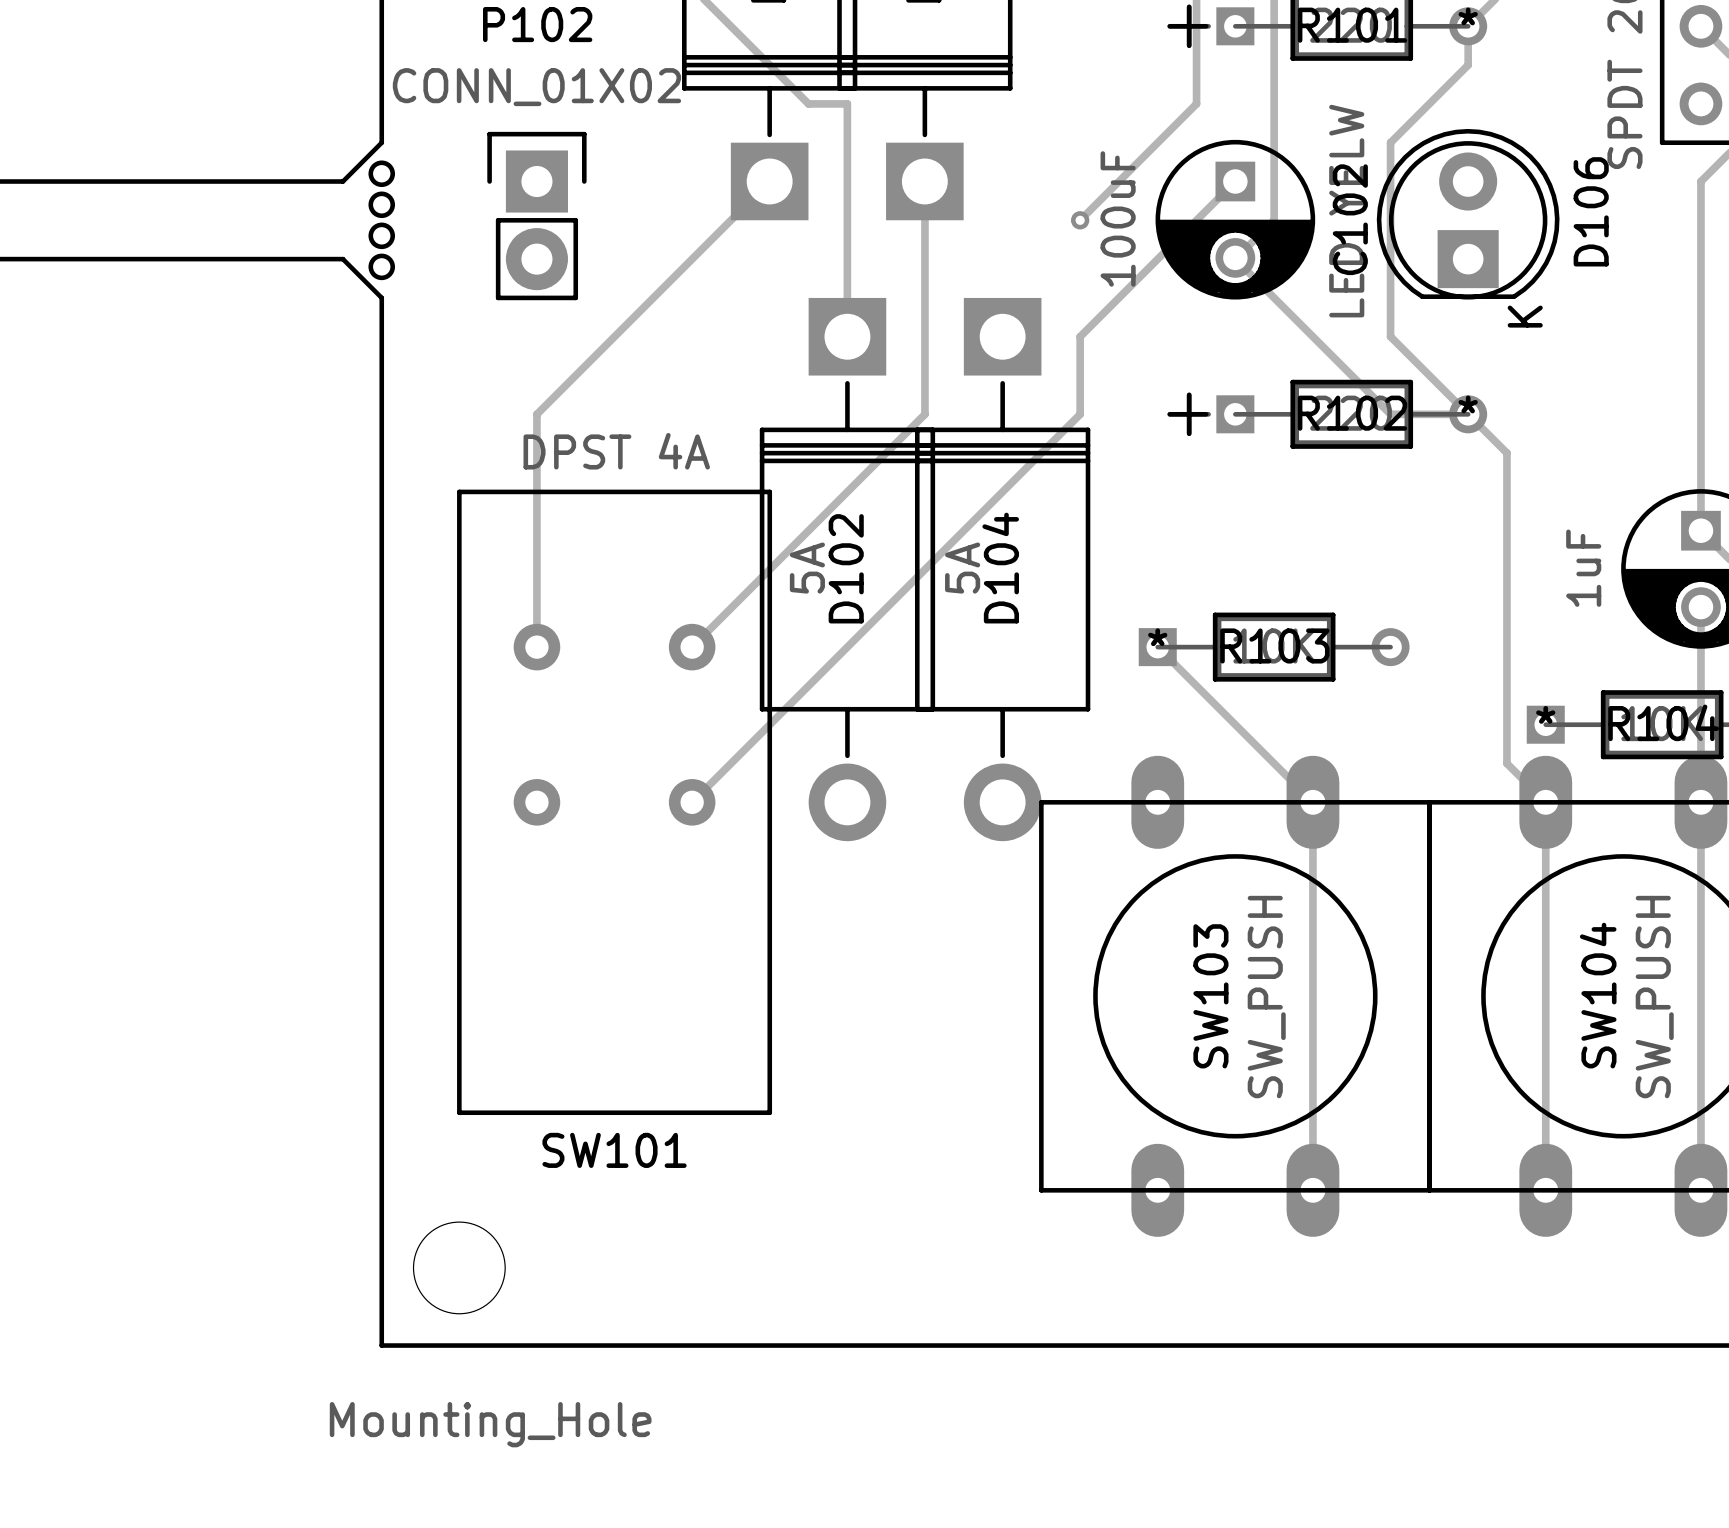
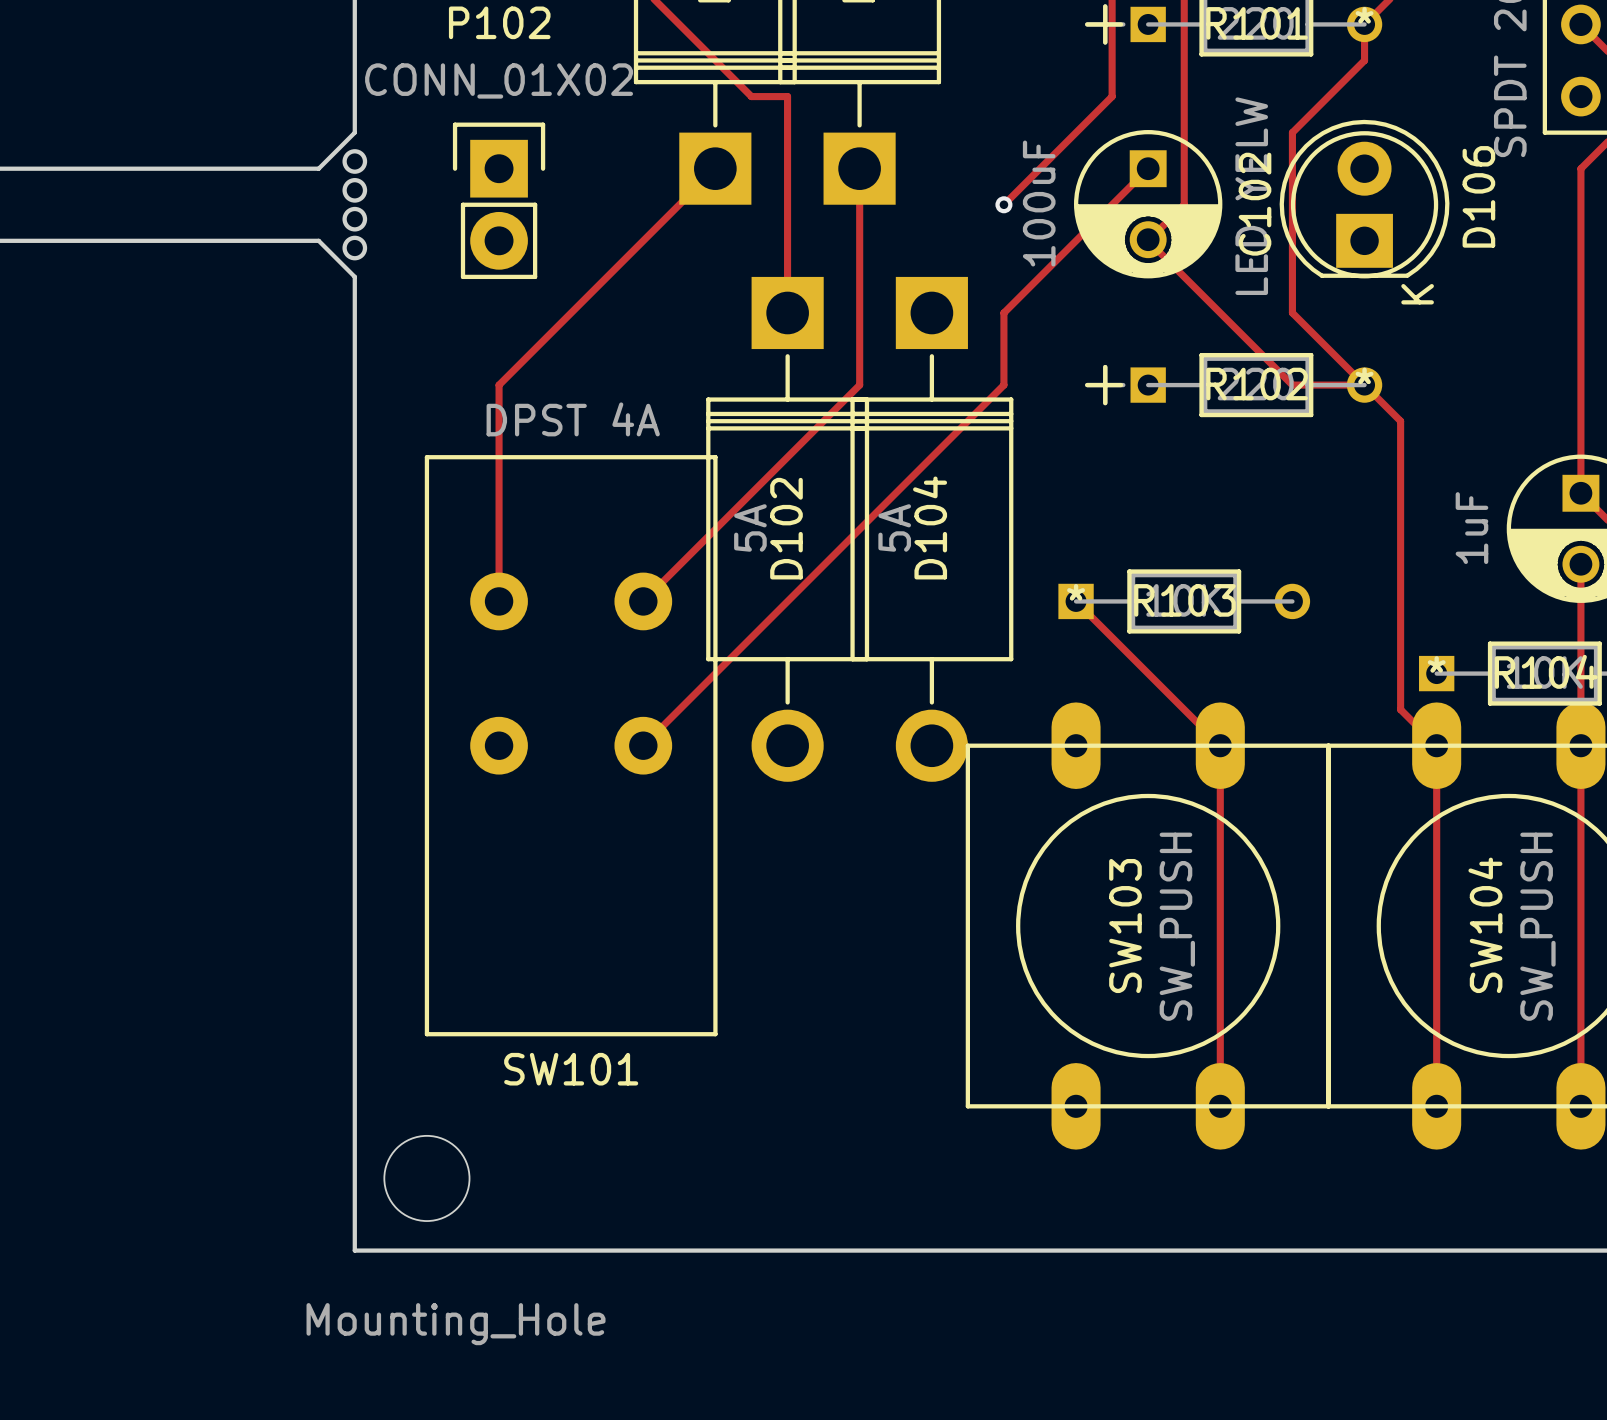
SW101 footprint: [457, 489, 773, 1116] -> [424, 455, 718, 1037]

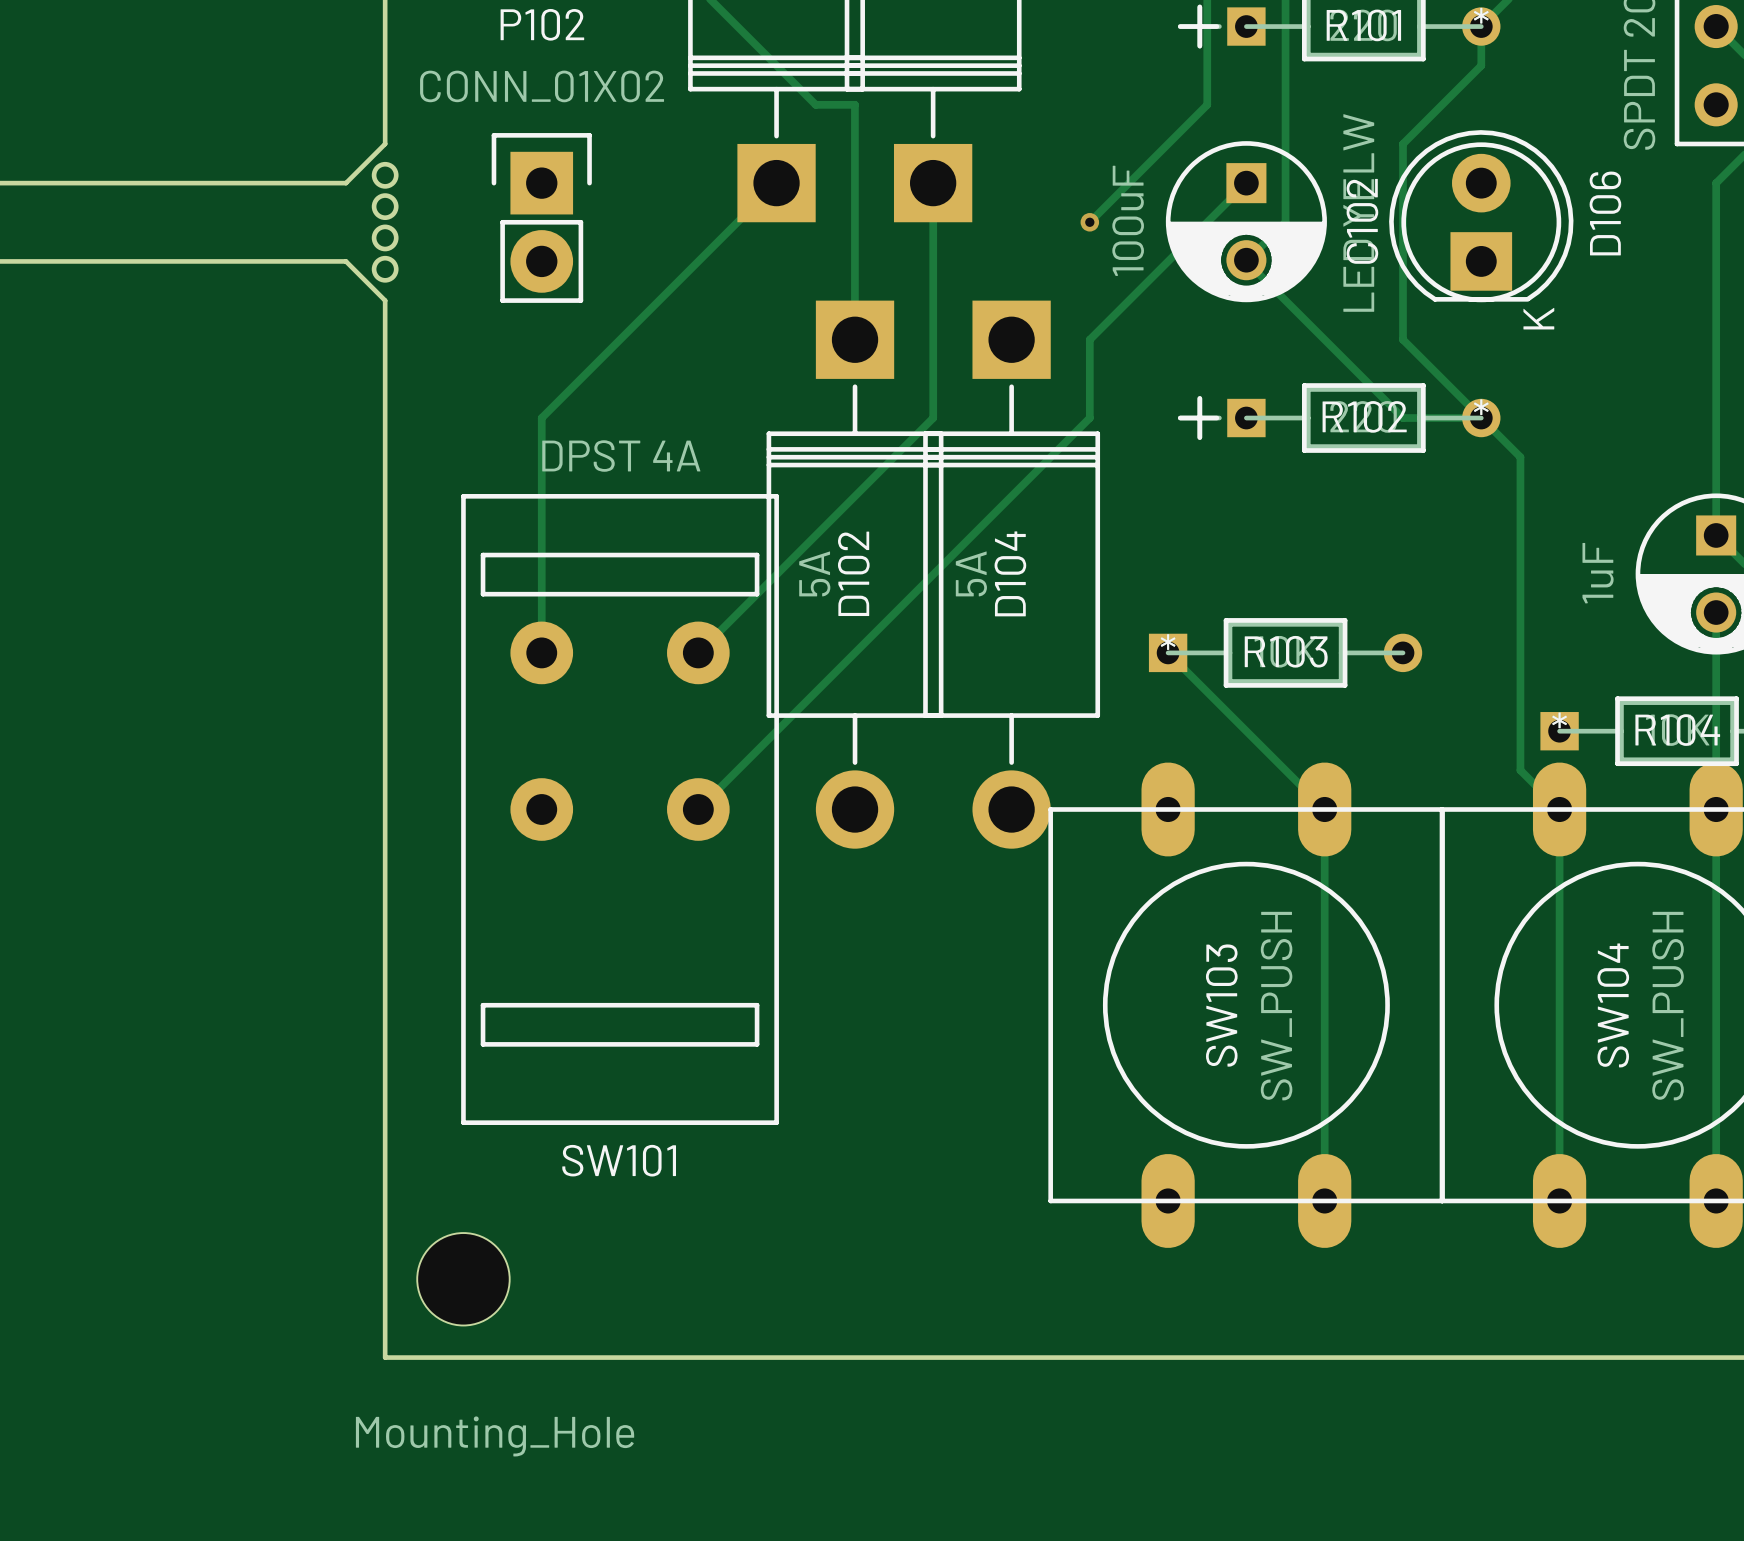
SW101 footprint: [424, 455, 718, 1037] -> [461, 494, 779, 1125]

